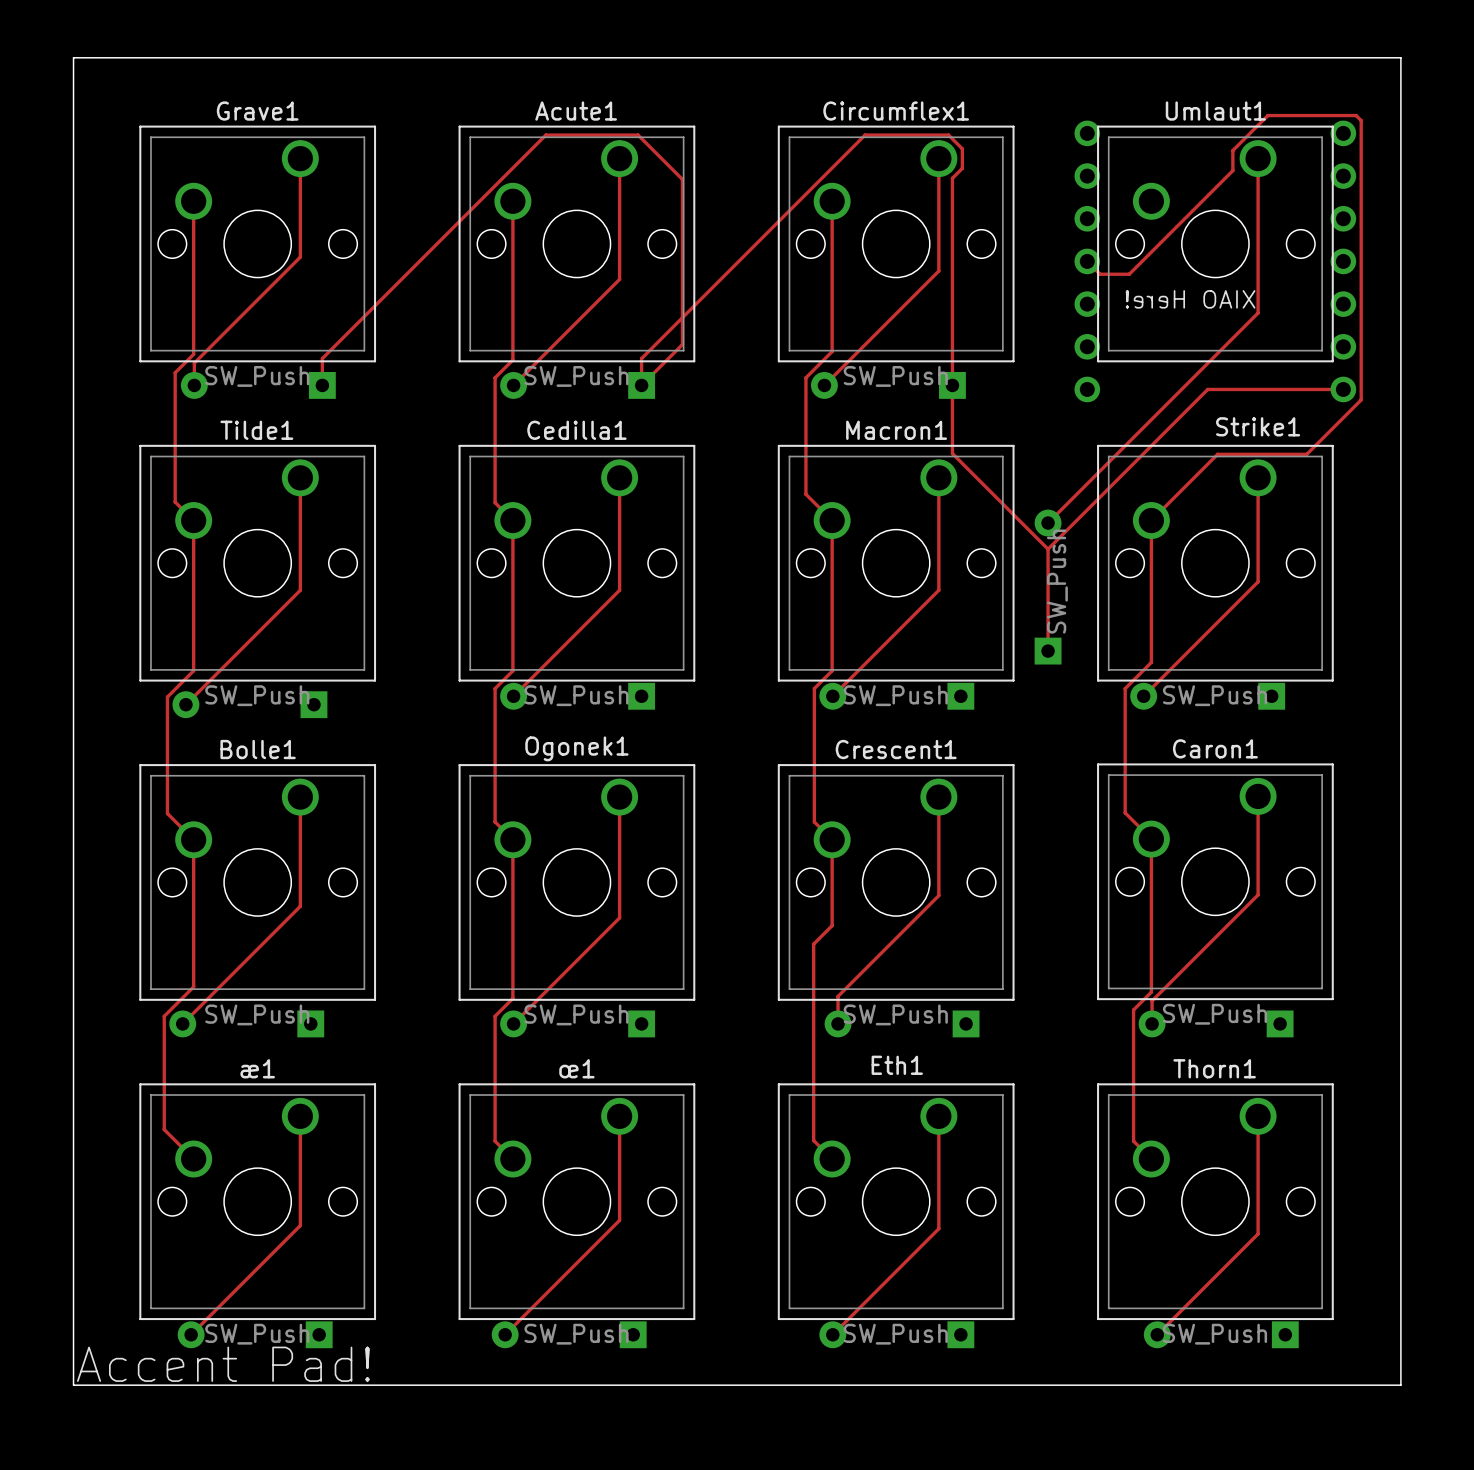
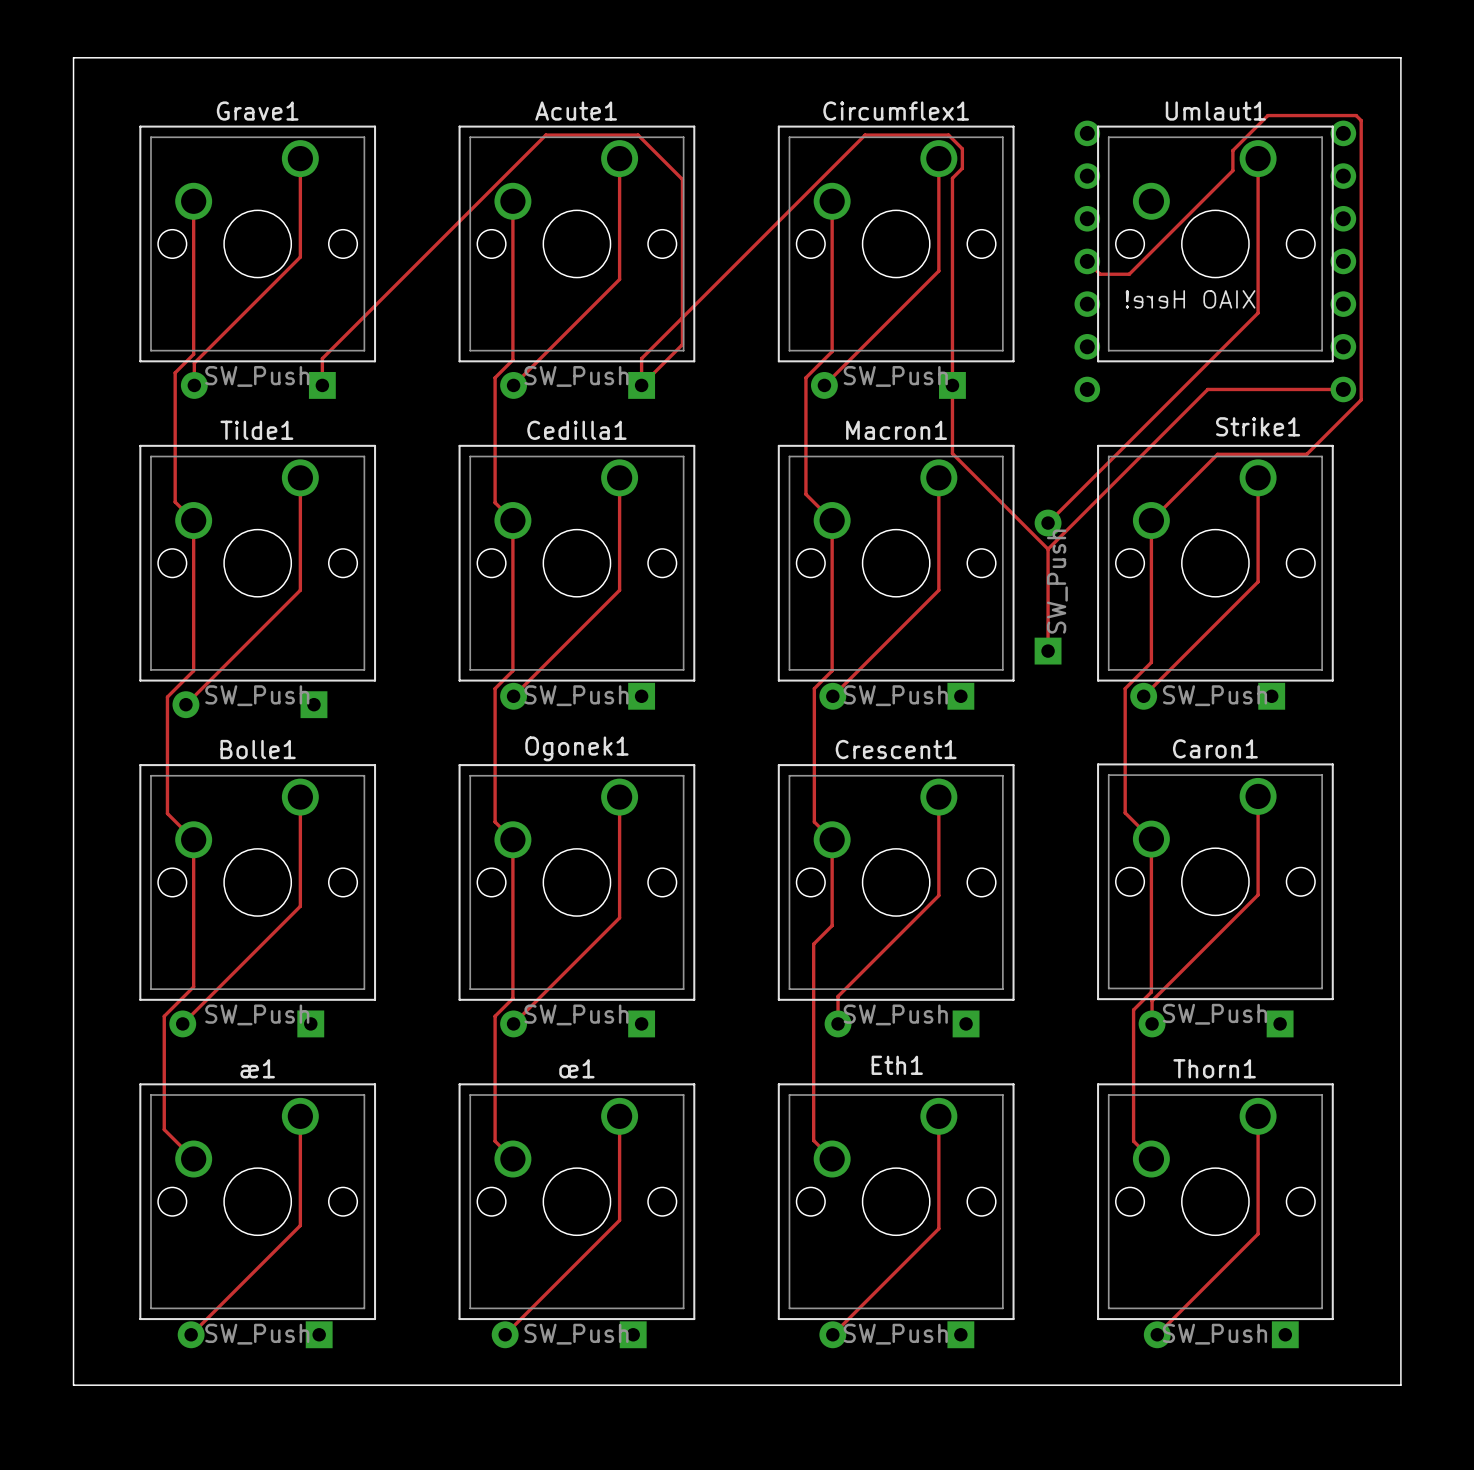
text: Accent Pad! (223, 1364) -> none

